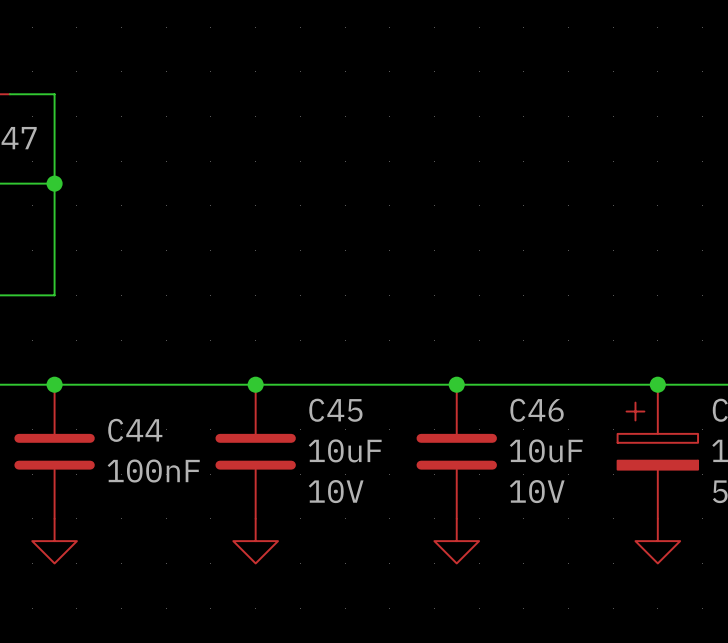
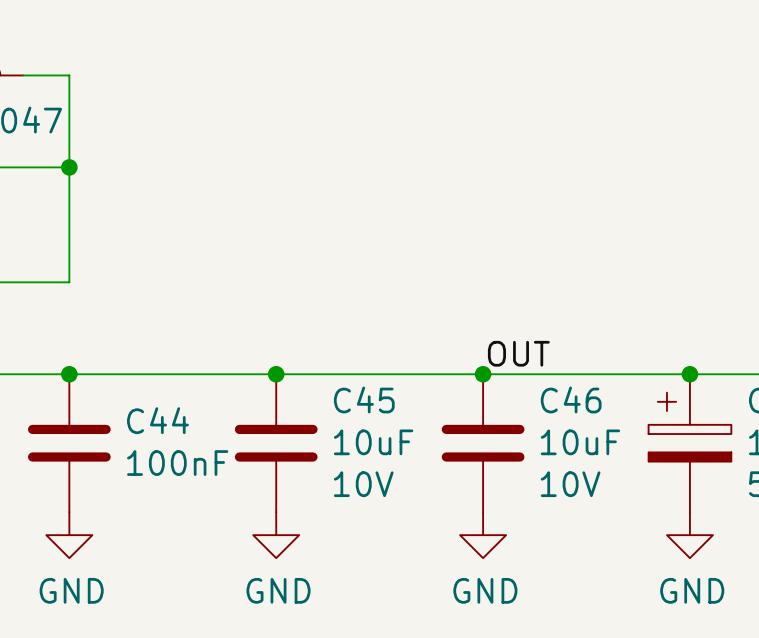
label: none -> OUT (518, 353)
power symbol text: none -> GND (71, 590)
power symbol text: none -> GND (278, 590)
power symbol text: none -> GND (485, 590)
power symbol text: none -> GND (692, 590)

